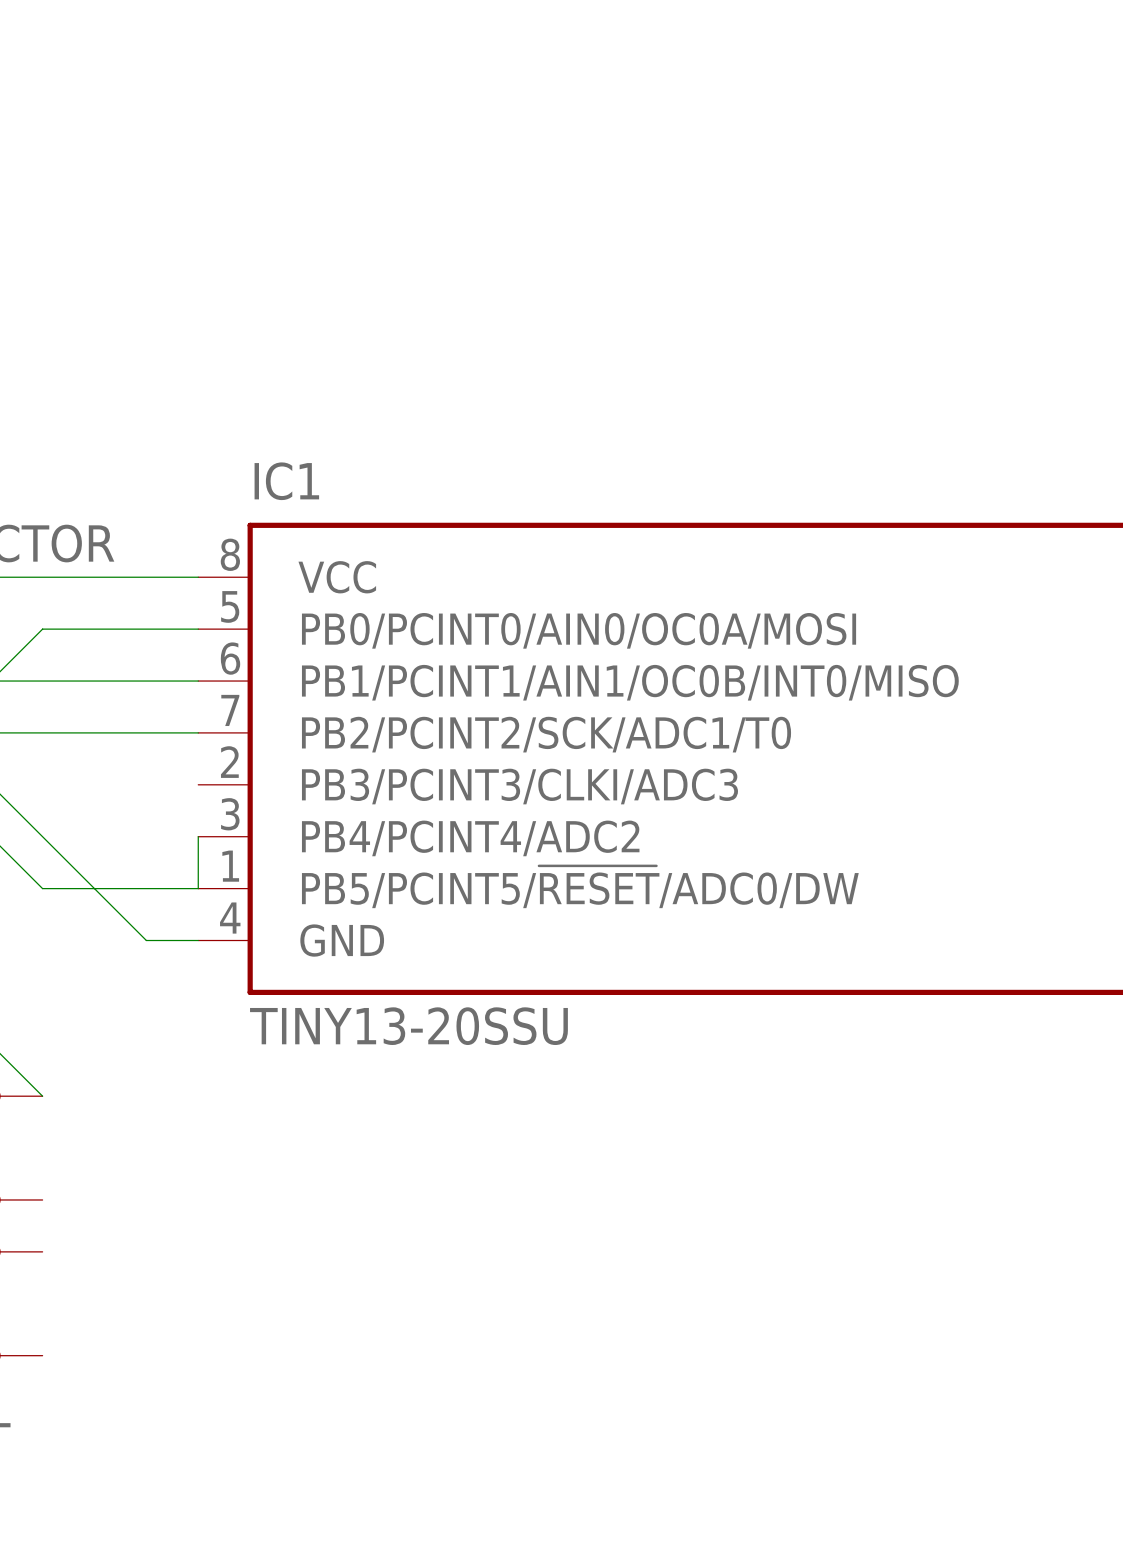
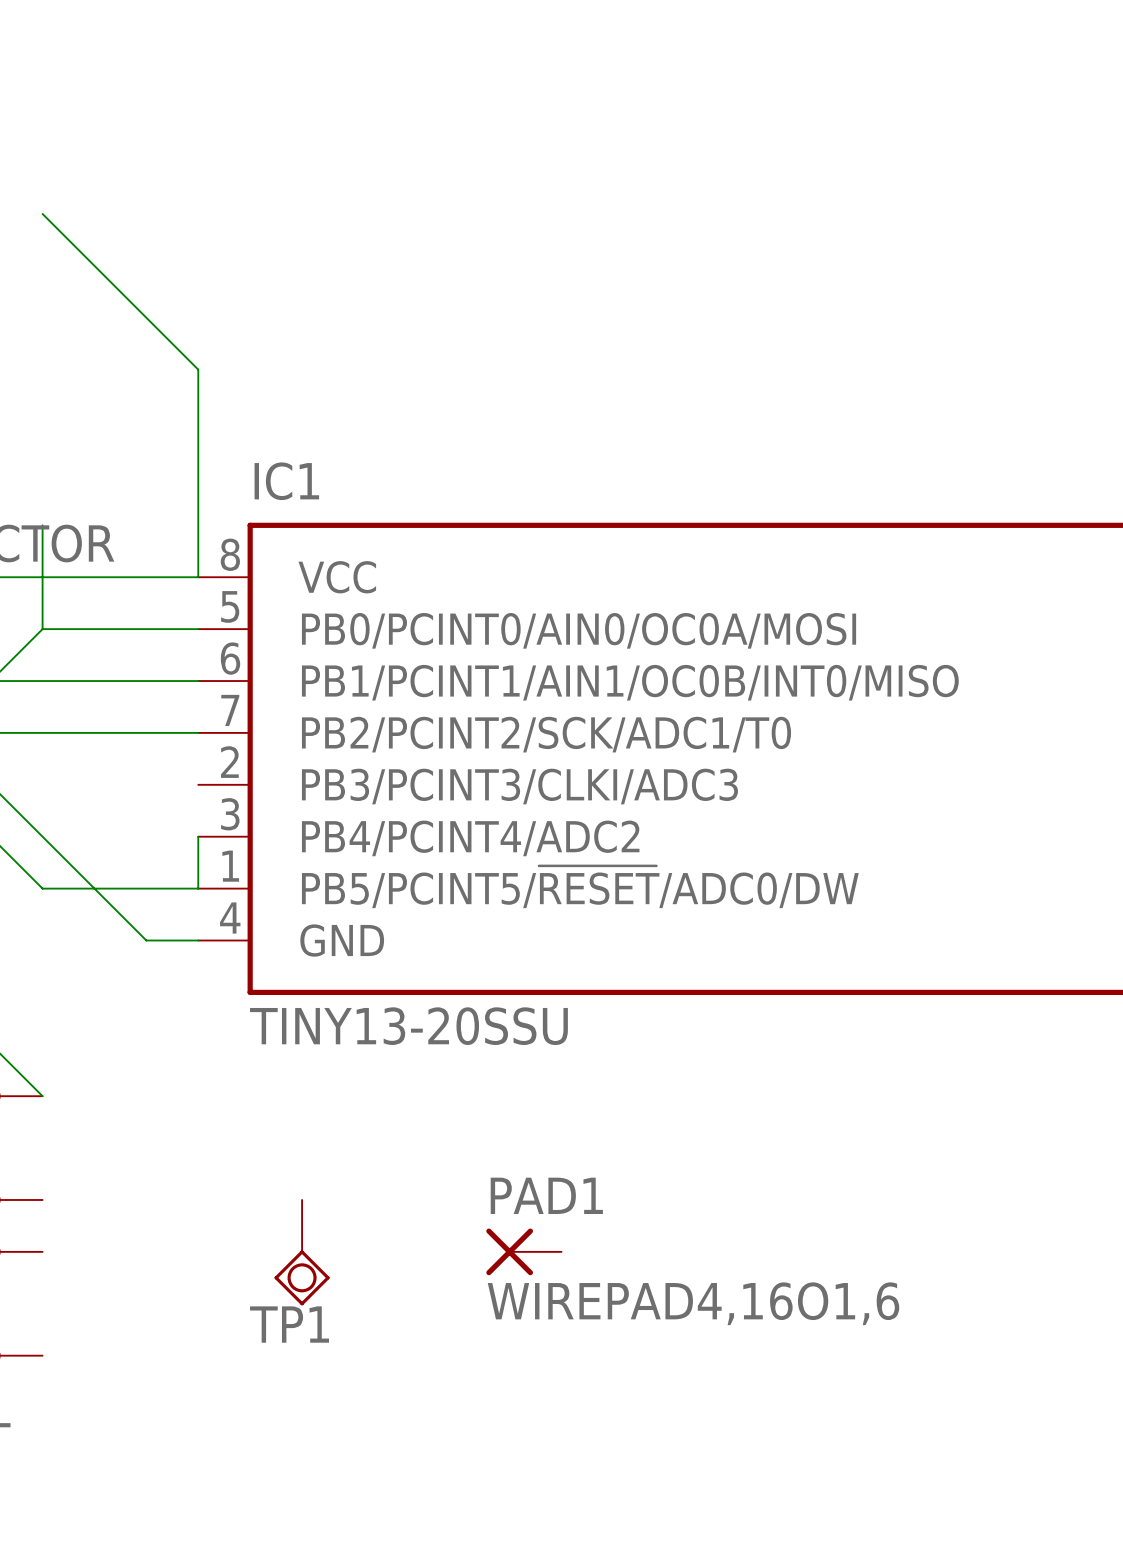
wire: none -> (42, 213) (198, 369) (198, 577)
wire: none -> (42, 525) (42, 629)
PAD1: none -> WIREPAD4,16O1,6 (523, 1251)
TP1: none -> (302, 1252)

